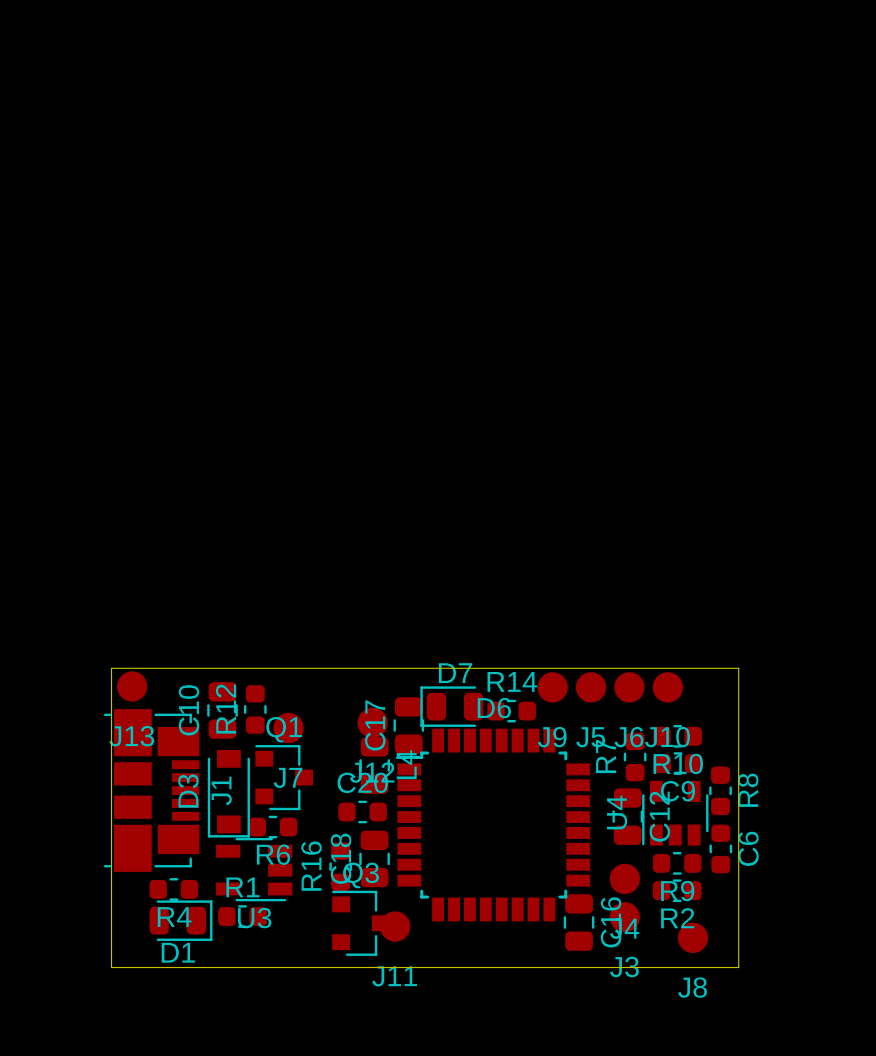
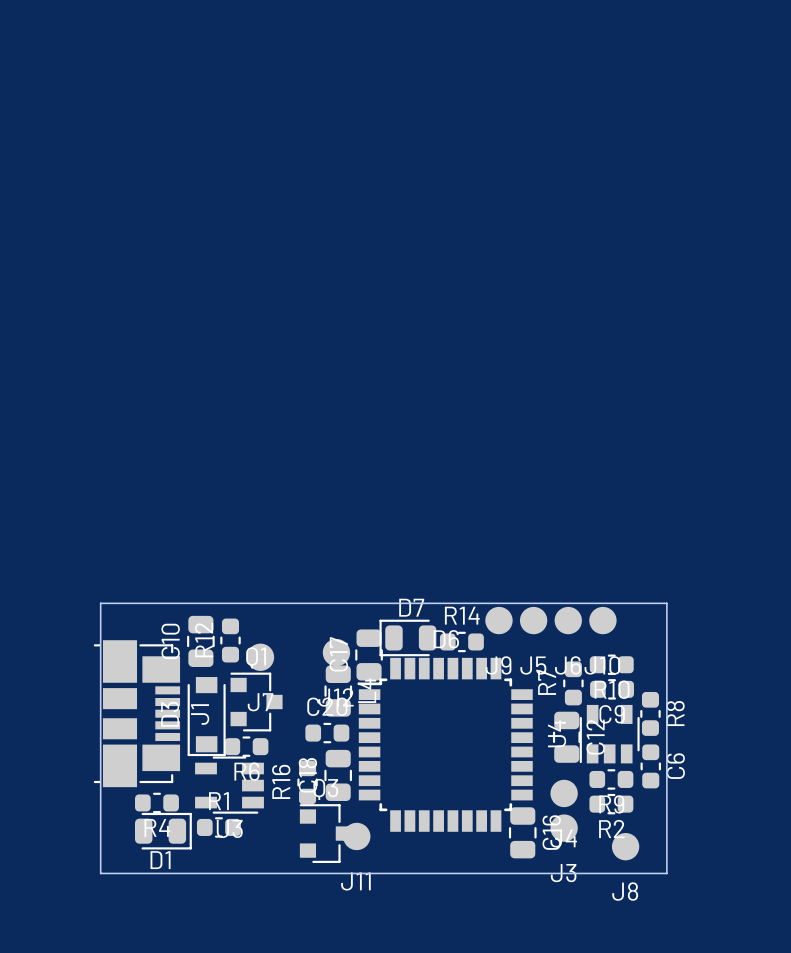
J13: (132, 686) -> none

